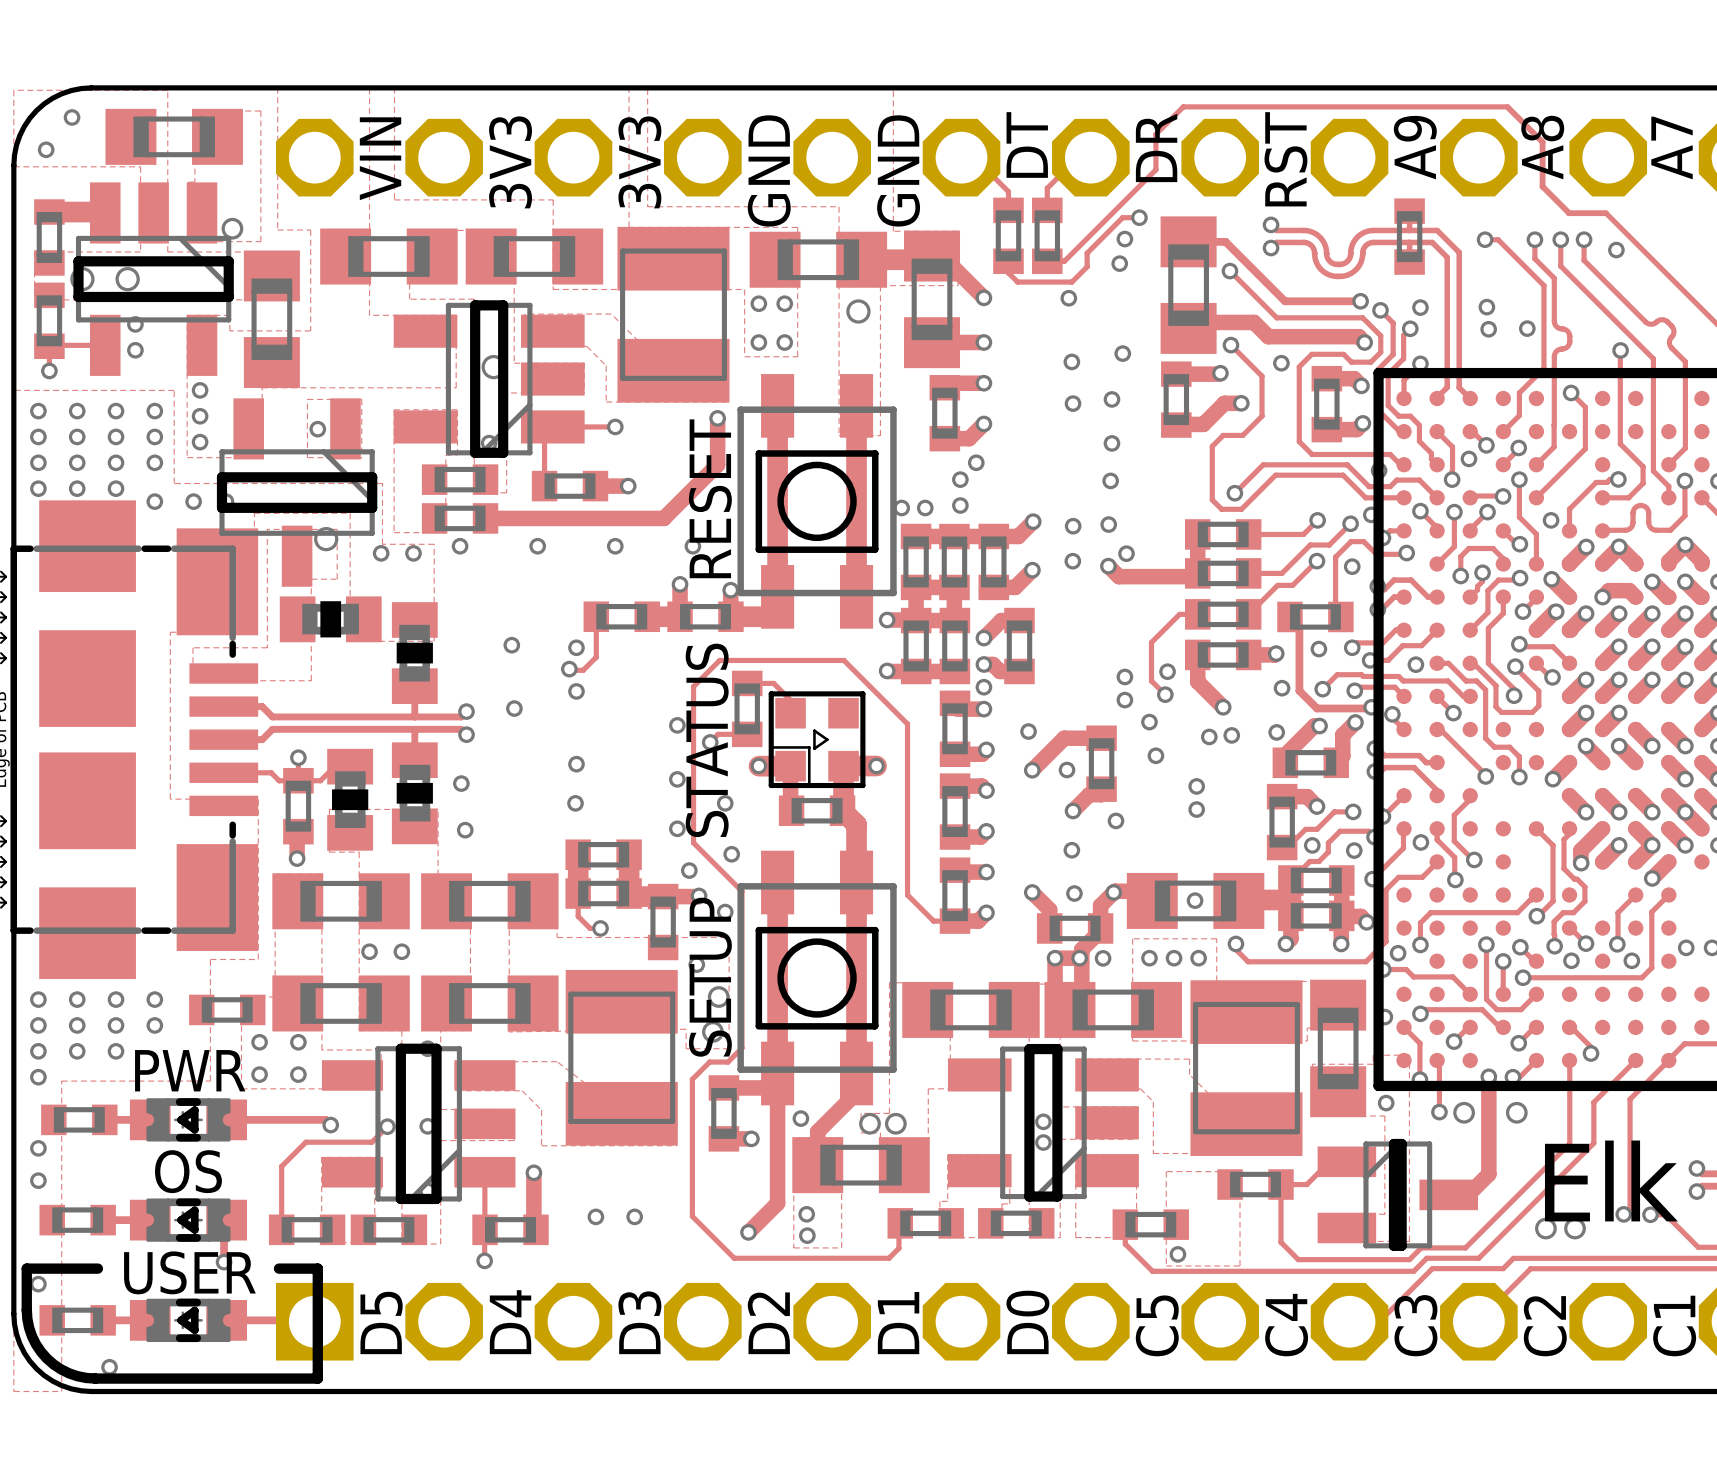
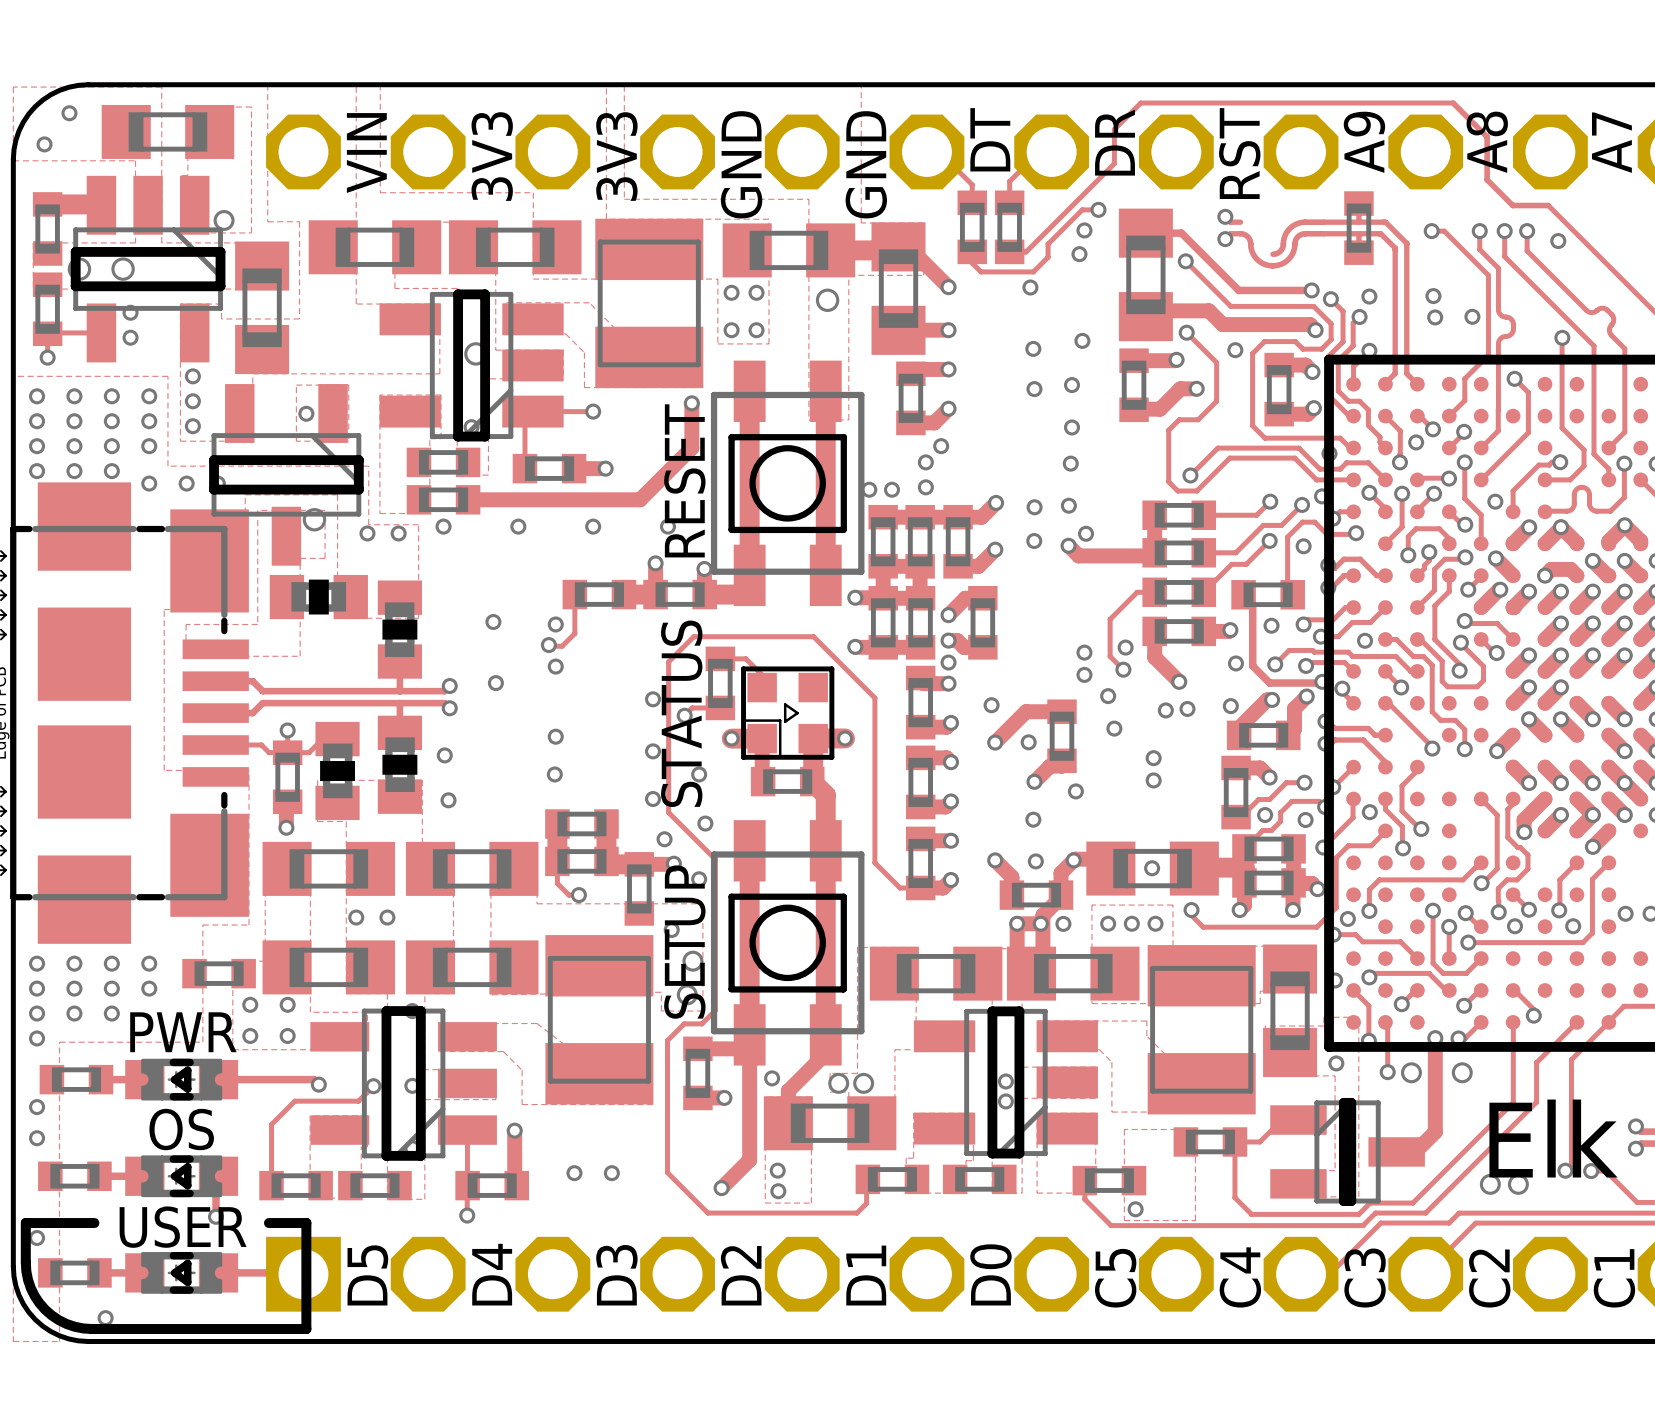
track: (1286, 230) (1306, 230) (1317, 235) (1324, 244) (1328, 260) (1337, 264) (1344, 263) (1348, 260) (1352, 244) (1357, 237) (1364, 232) (1373, 230) -> (1273, 254) (1281, 250) (1286, 233) (1294, 225) (1302, 222) (1324, 222)
track: (1286, 242) (1305, 242) (1310, 244) (1313, 249) (1319, 267) (1328, 274) (1337, 276) (1348, 274) (1356, 269) (1360, 262) (1364, 247) (1373, 242) -> (1273, 265) (1281, 264) (1288, 259) (1293, 252) (1295, 240) (1300, 235) (1324, 233)
track: none -> (1240, 233) (1249, 238) (1252, 252) (1257, 259) (1264, 264) (1272, 265)

